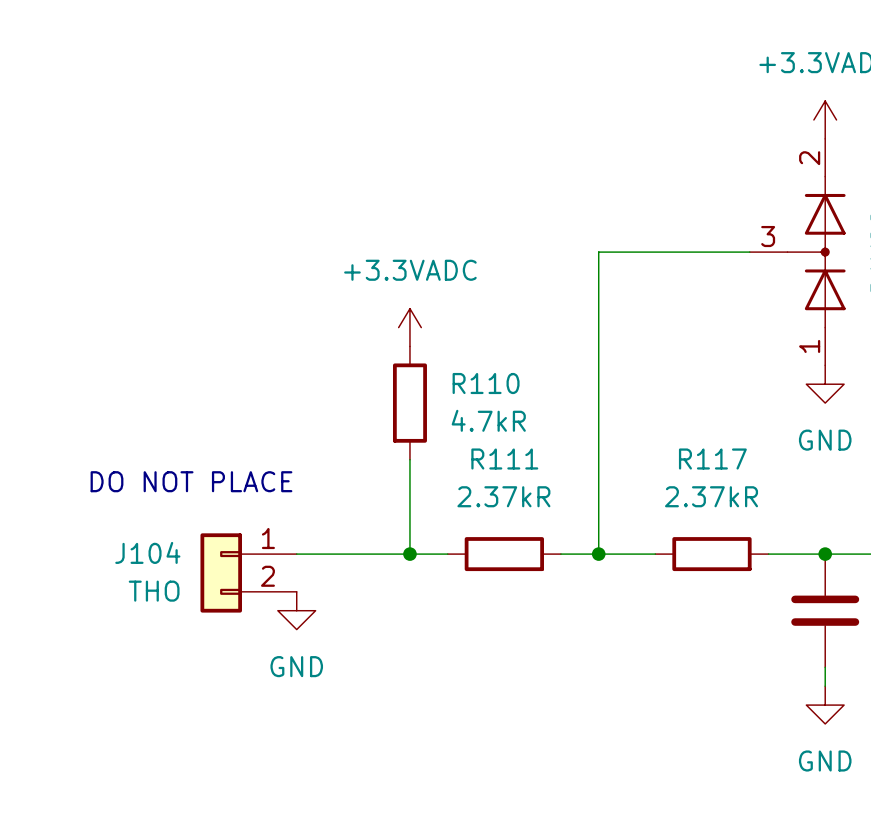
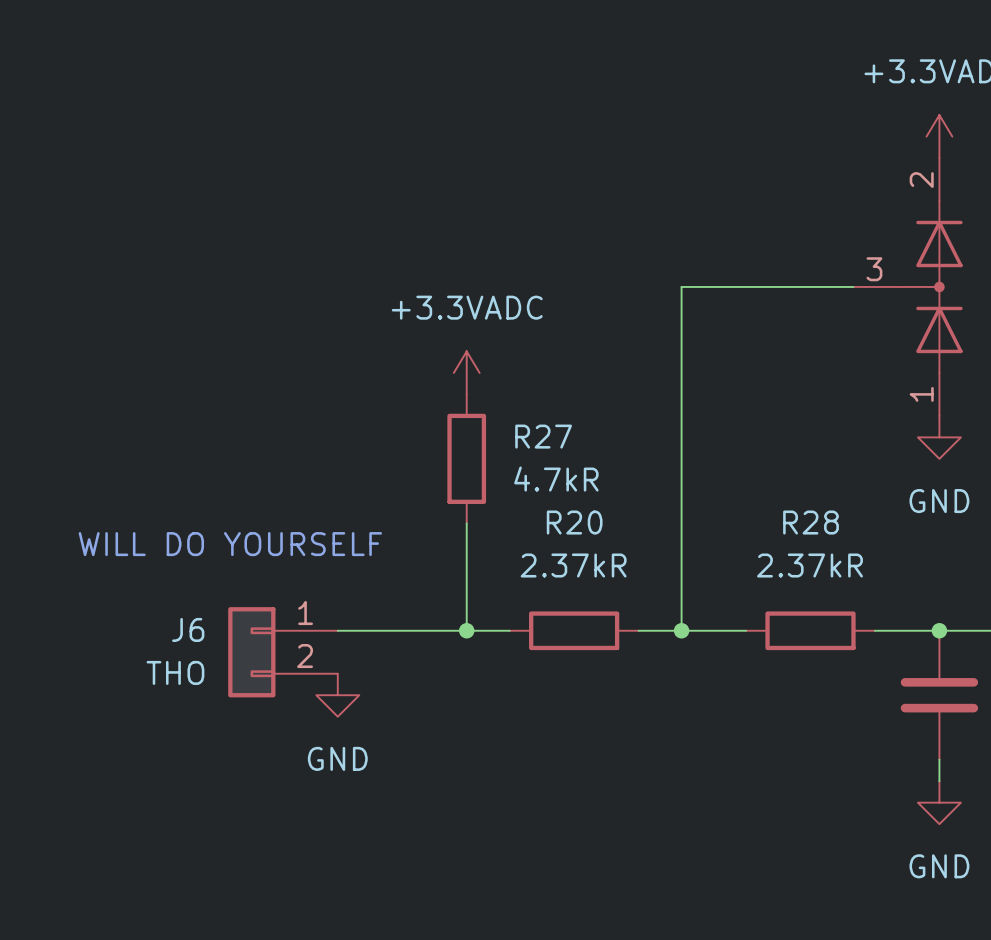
R110 name: R110 (486, 383) -> R27 (543, 436)
R111 name: R111 (504, 459) -> R20 (574, 522)
R117 name: R117 (712, 459) -> R28 (811, 522)
text: DO NOT PLACE (191, 481) -> WILL DO YOURSELF (230, 544)
J104 name: J104 (147, 552) -> J6 (188, 629)

